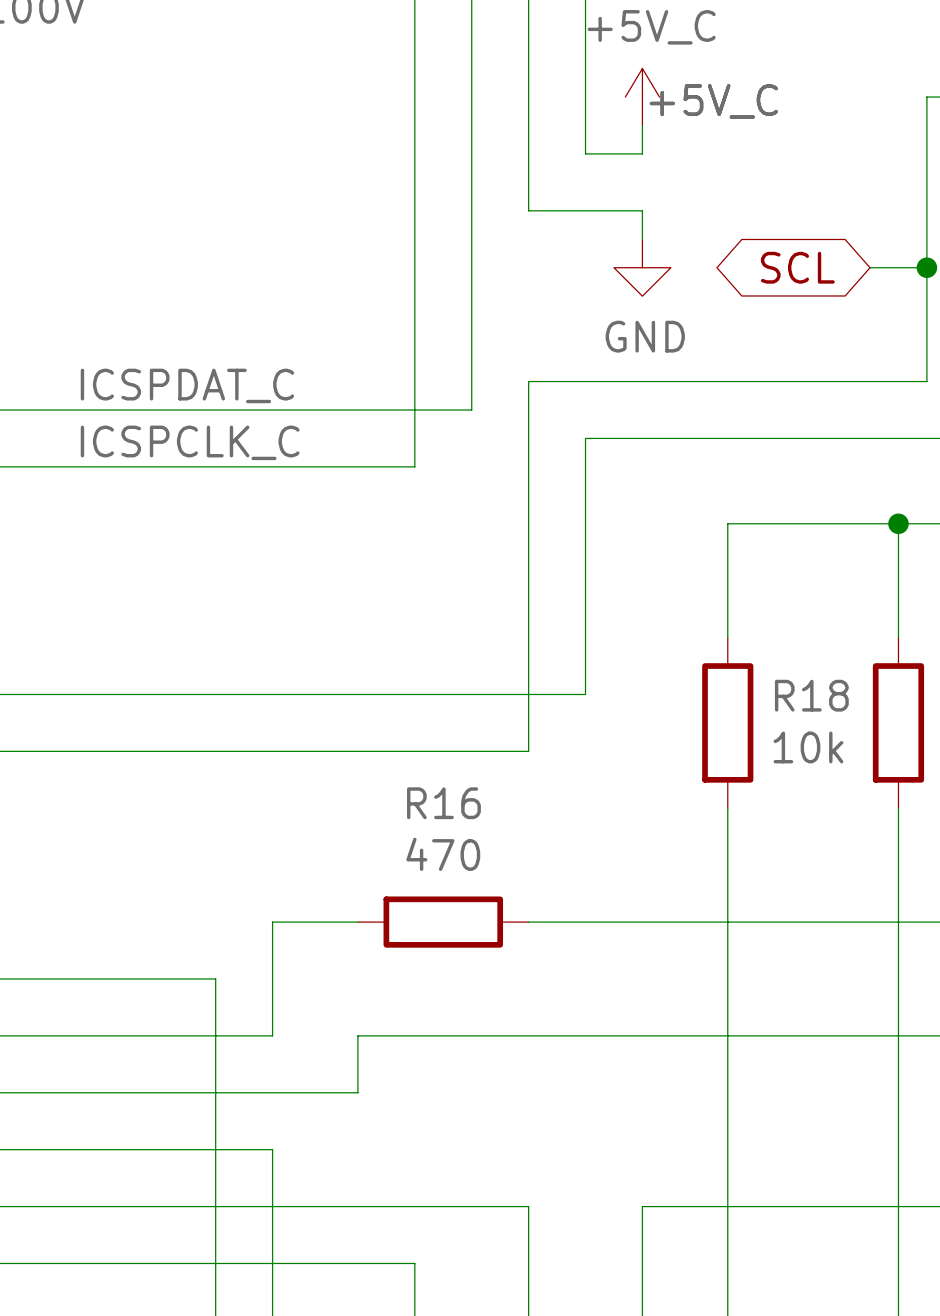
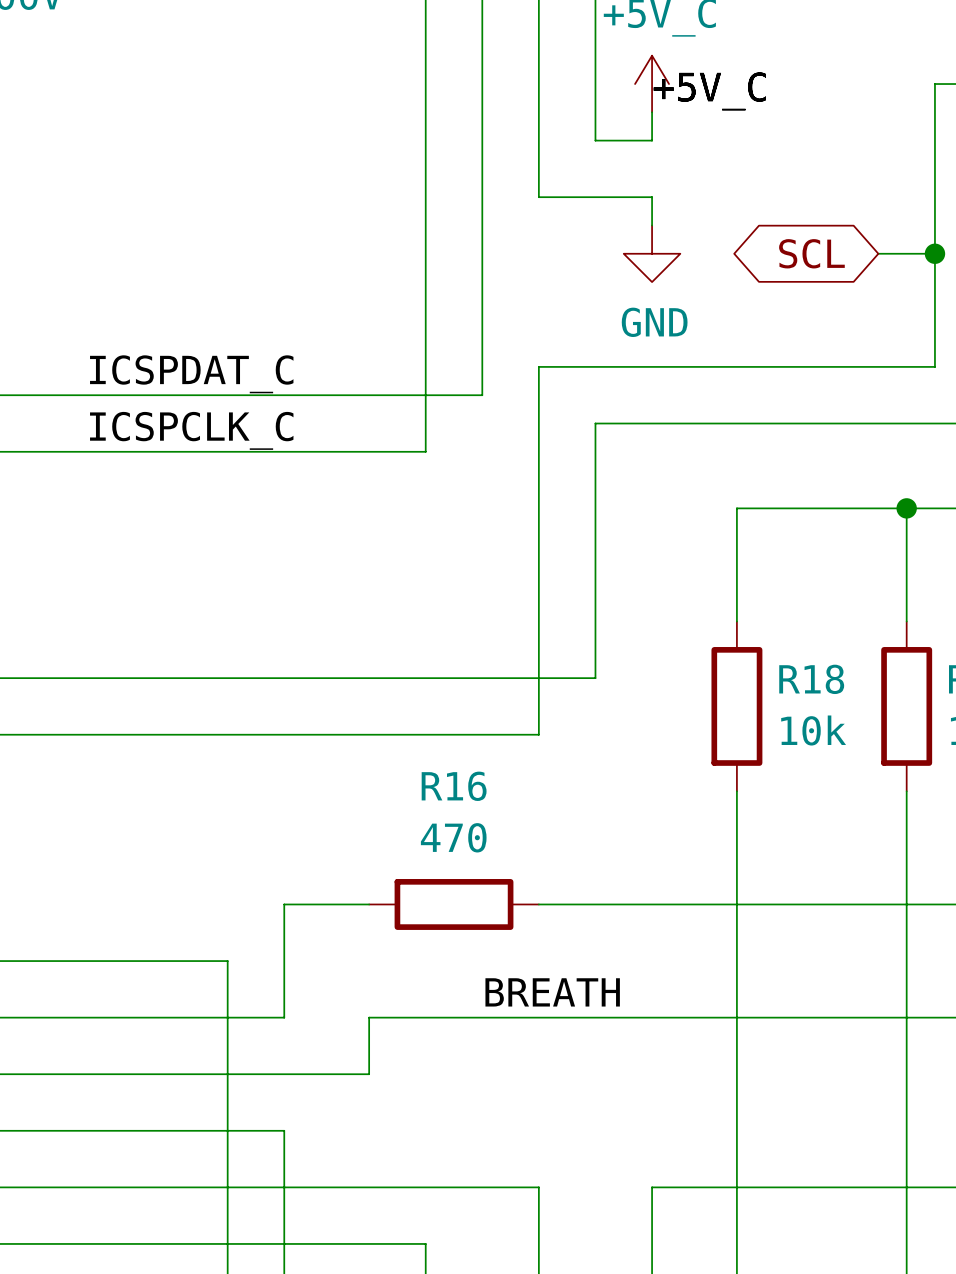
label: none -> BREATH (552, 992)

